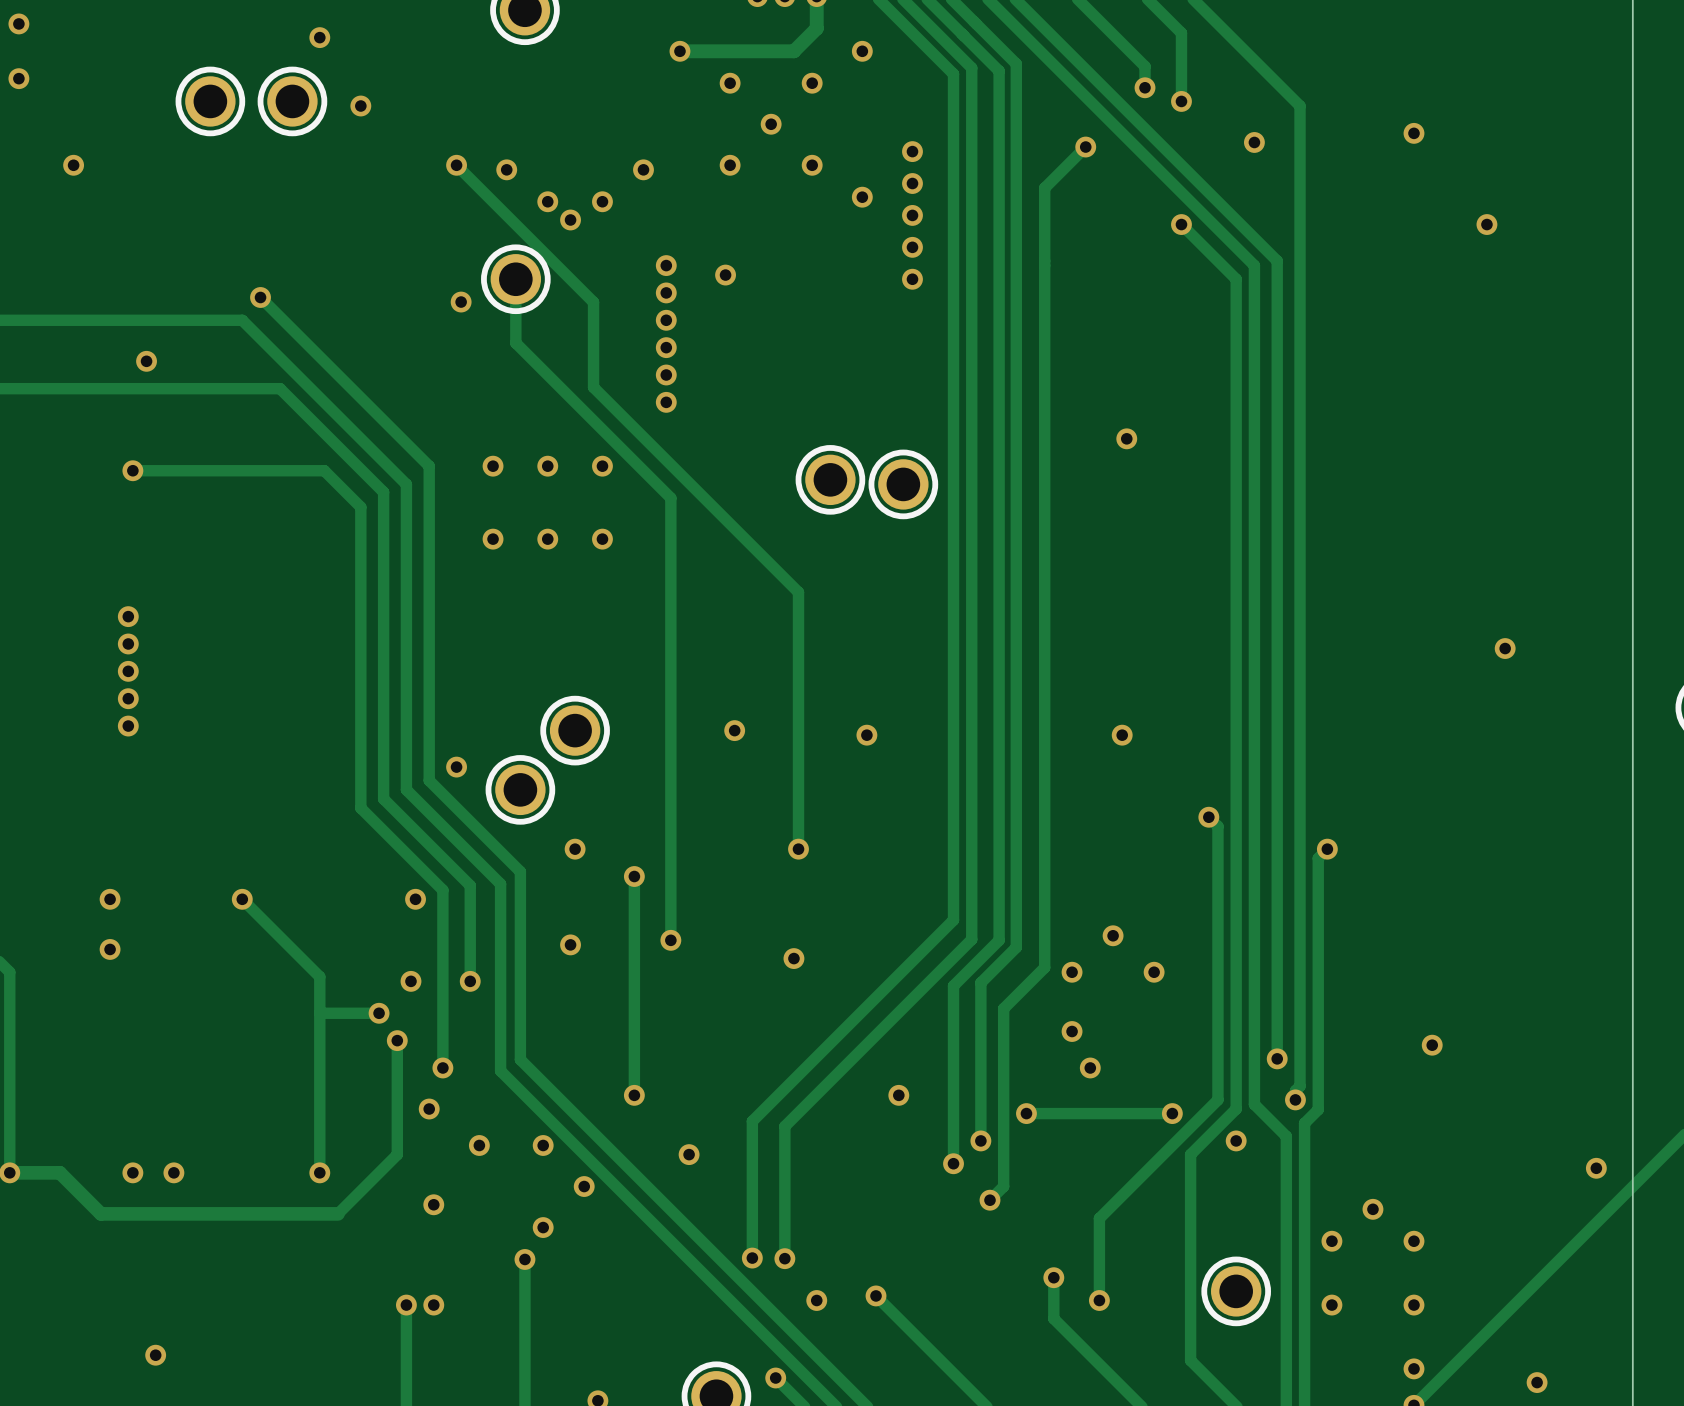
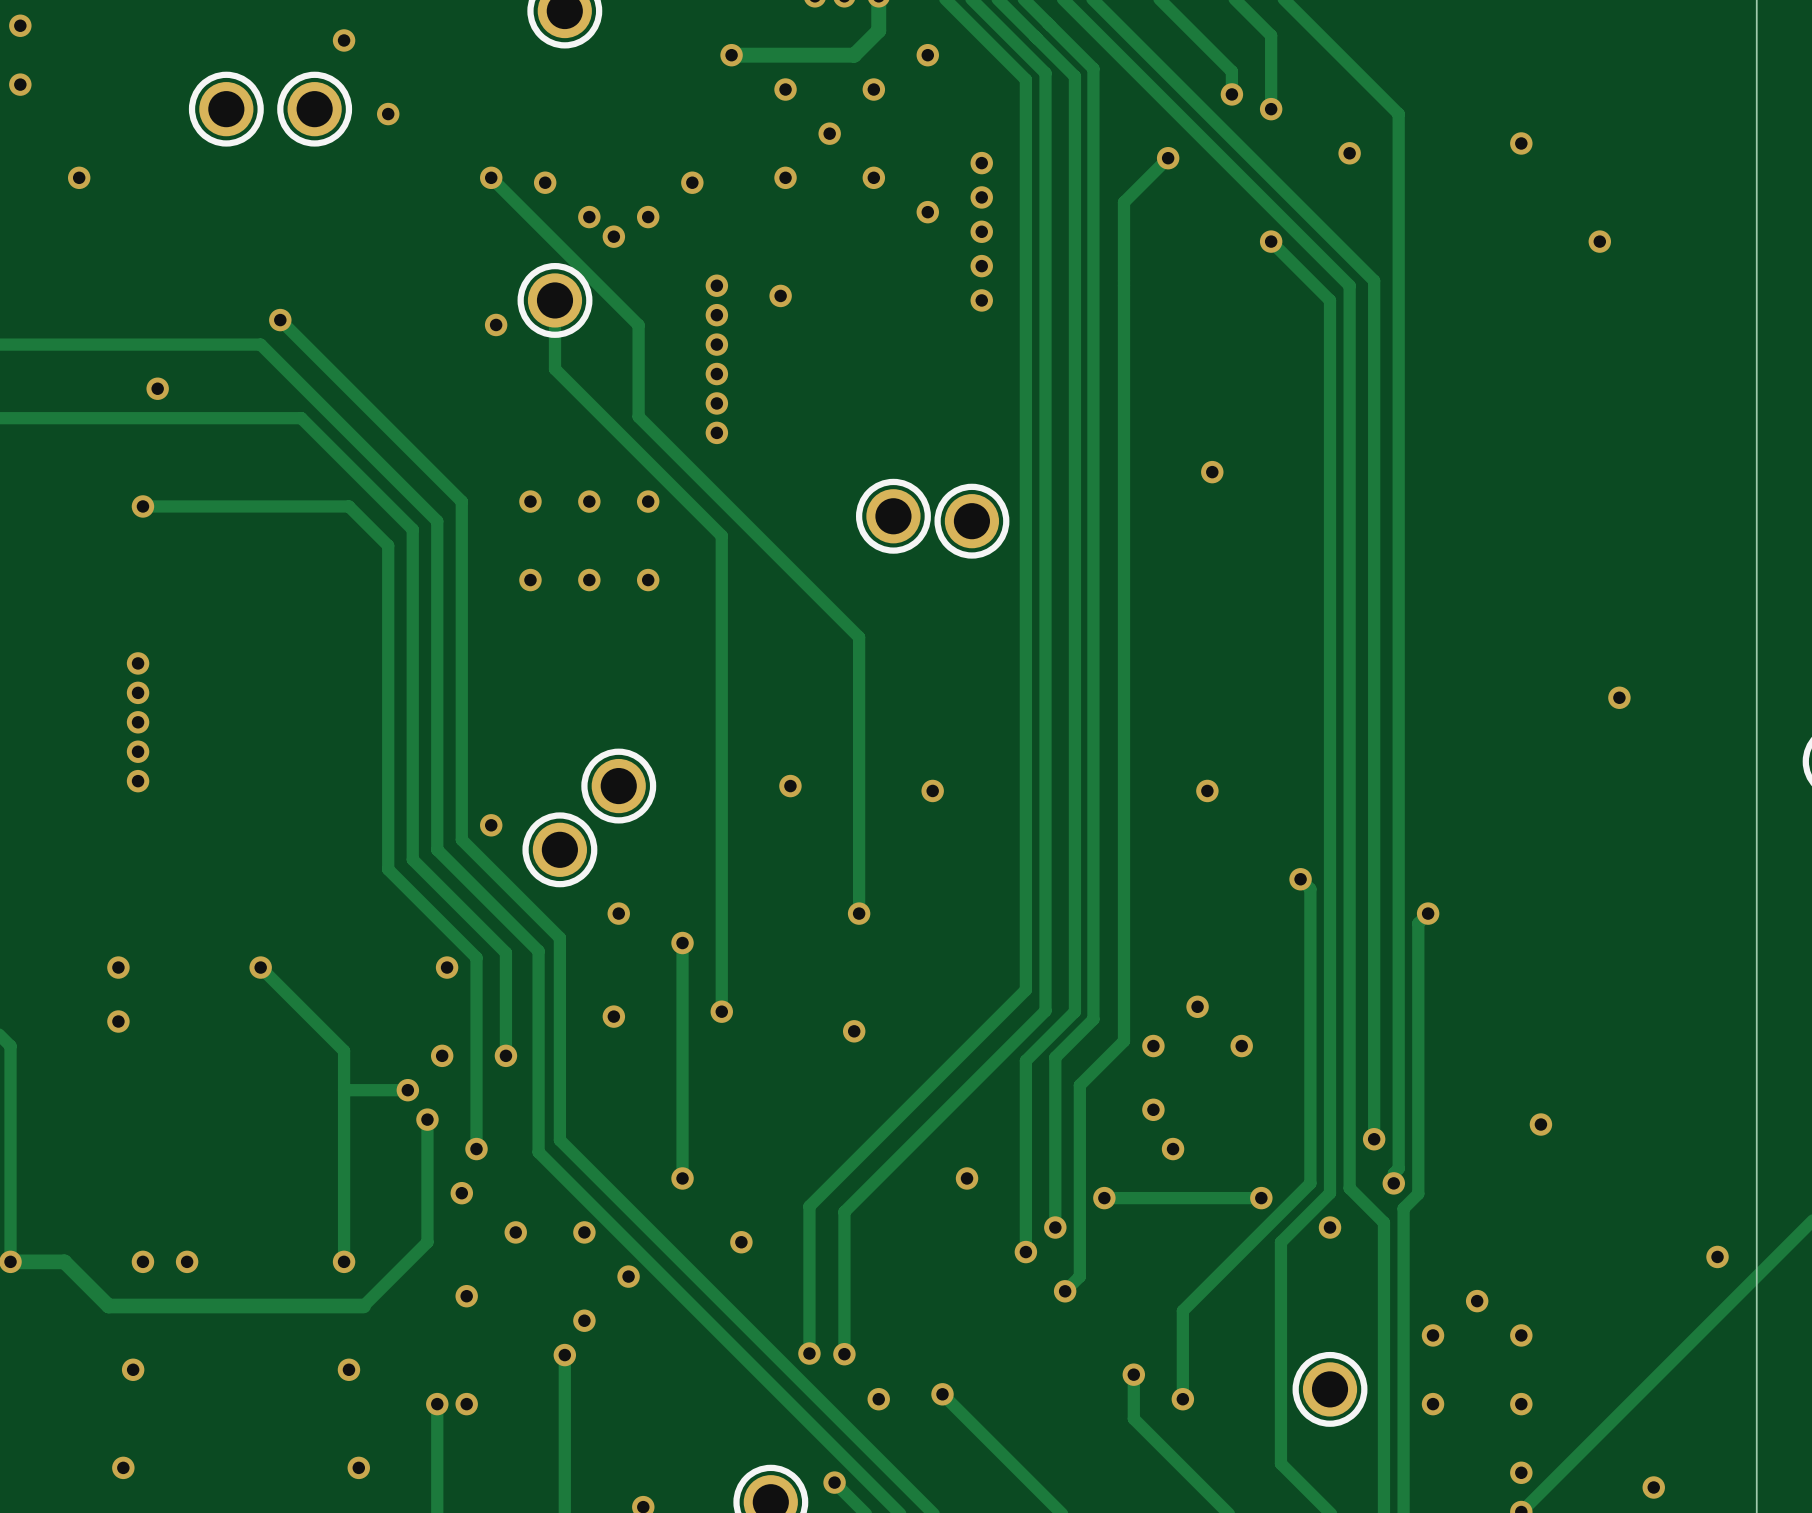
via: none -> (133, 1369)
via: none -> (348, 1369)
via position: (155, 1355) -> (123, 1467)
via: none -> (358, 1467)

